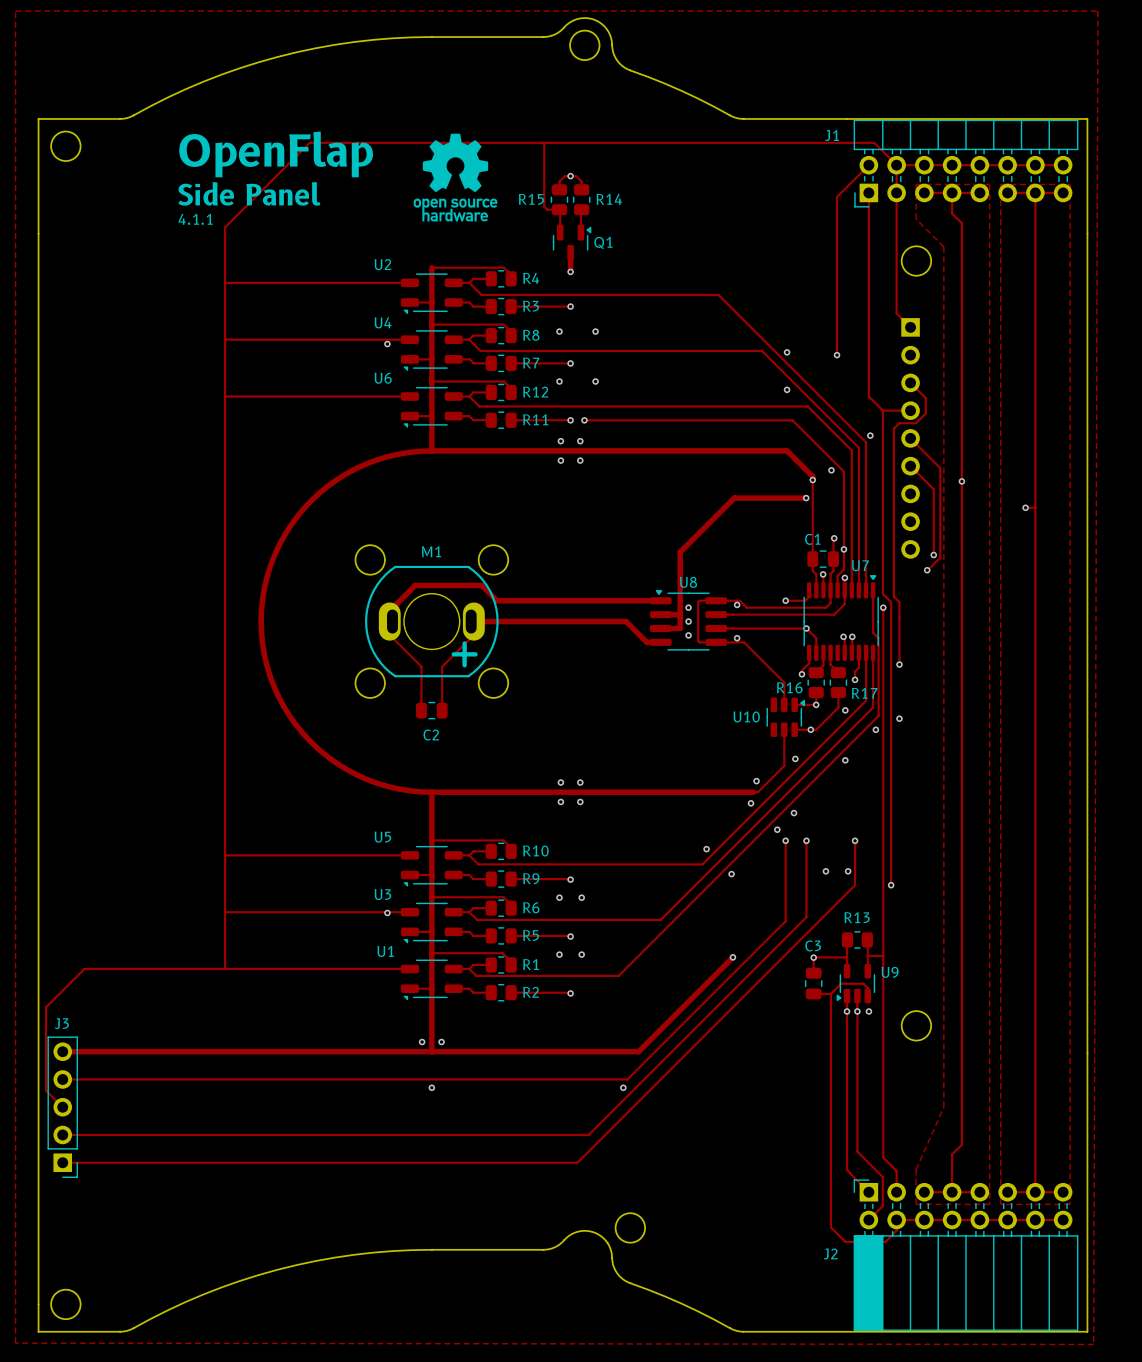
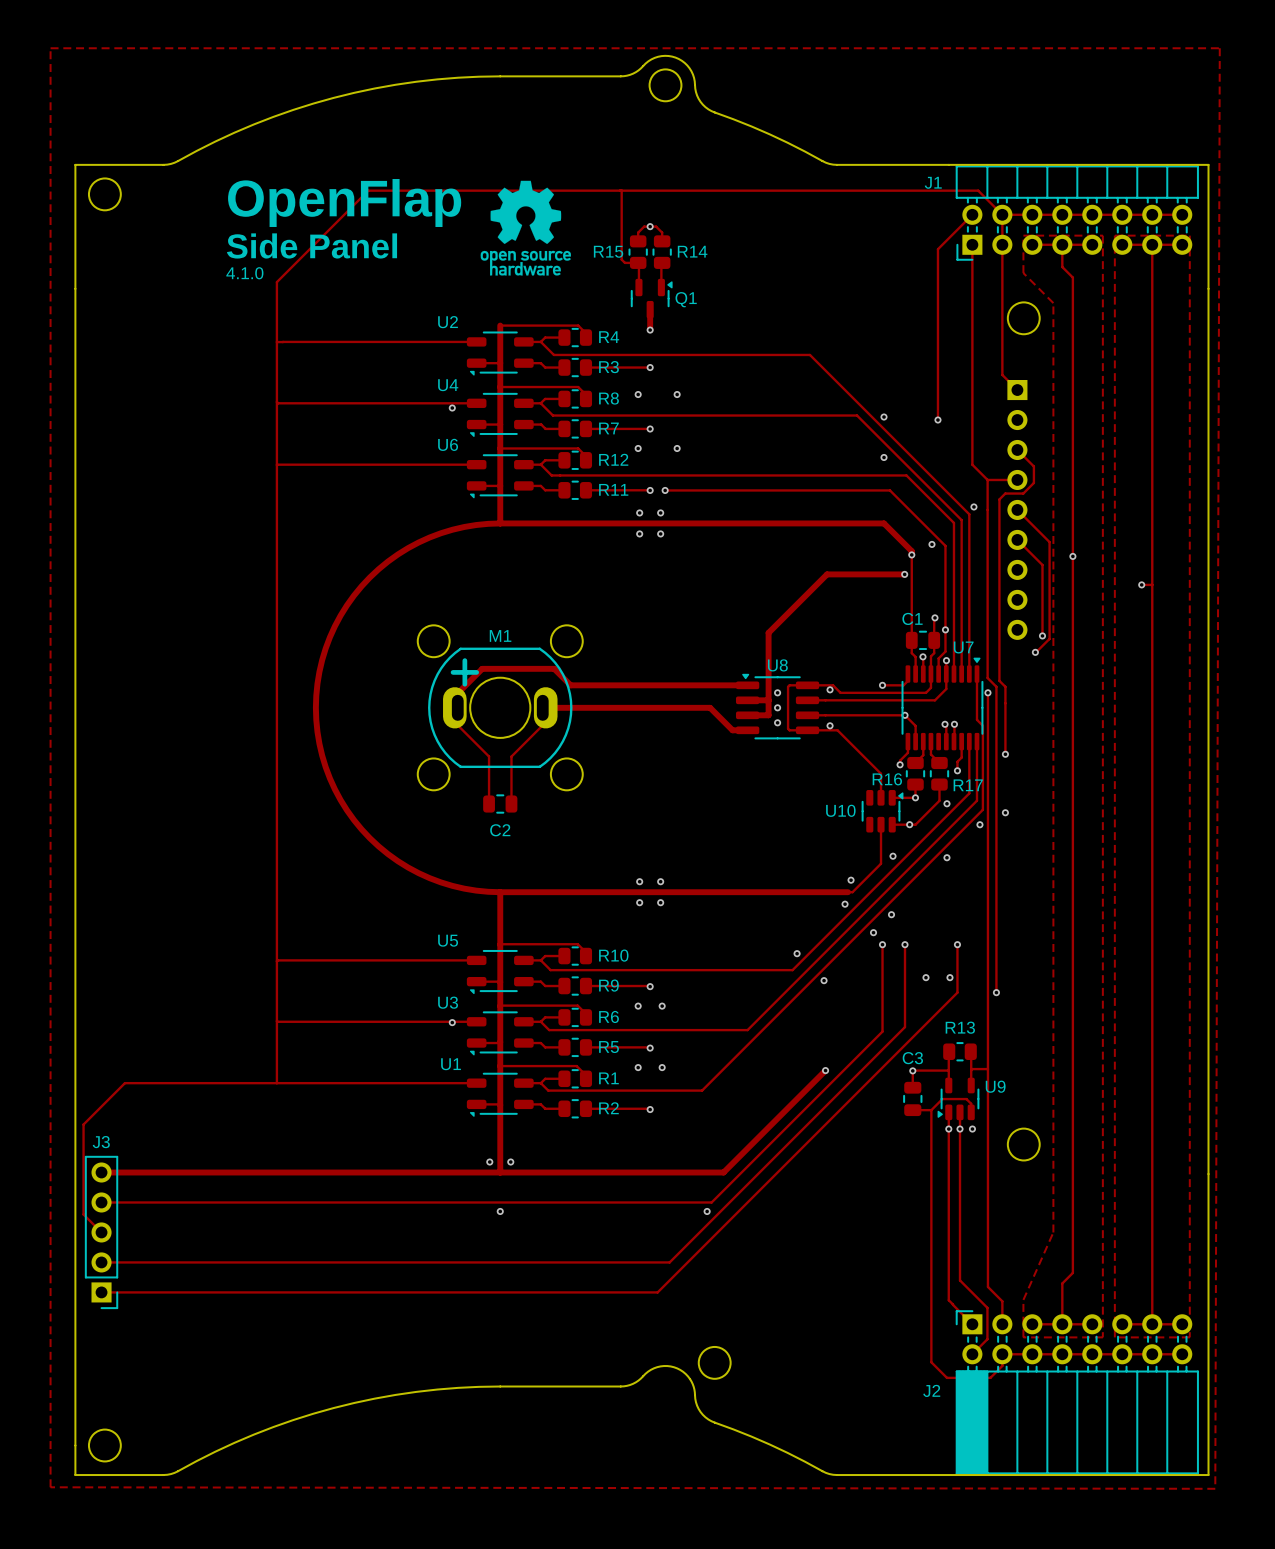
text: 4.1.1 (195, 219) -> 4.1.0 (244, 273)
M1 rotation: 0° (431, 621) -> 180° (500, 707)

